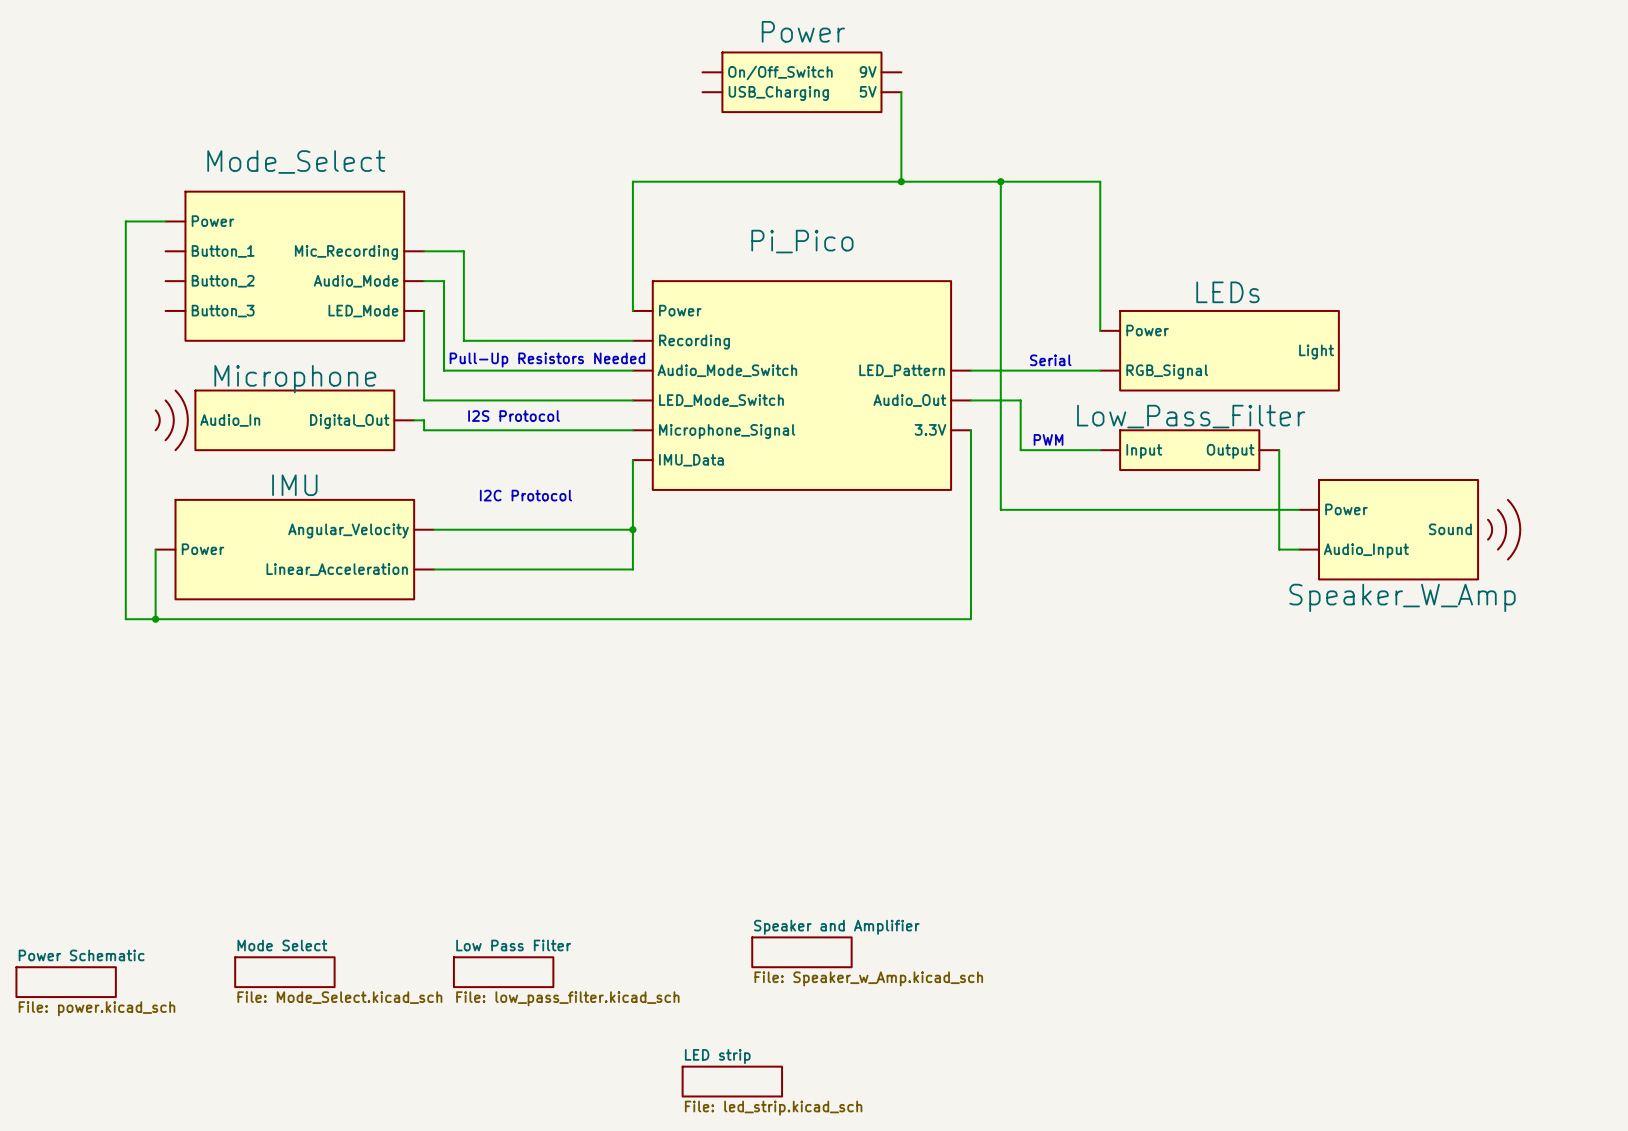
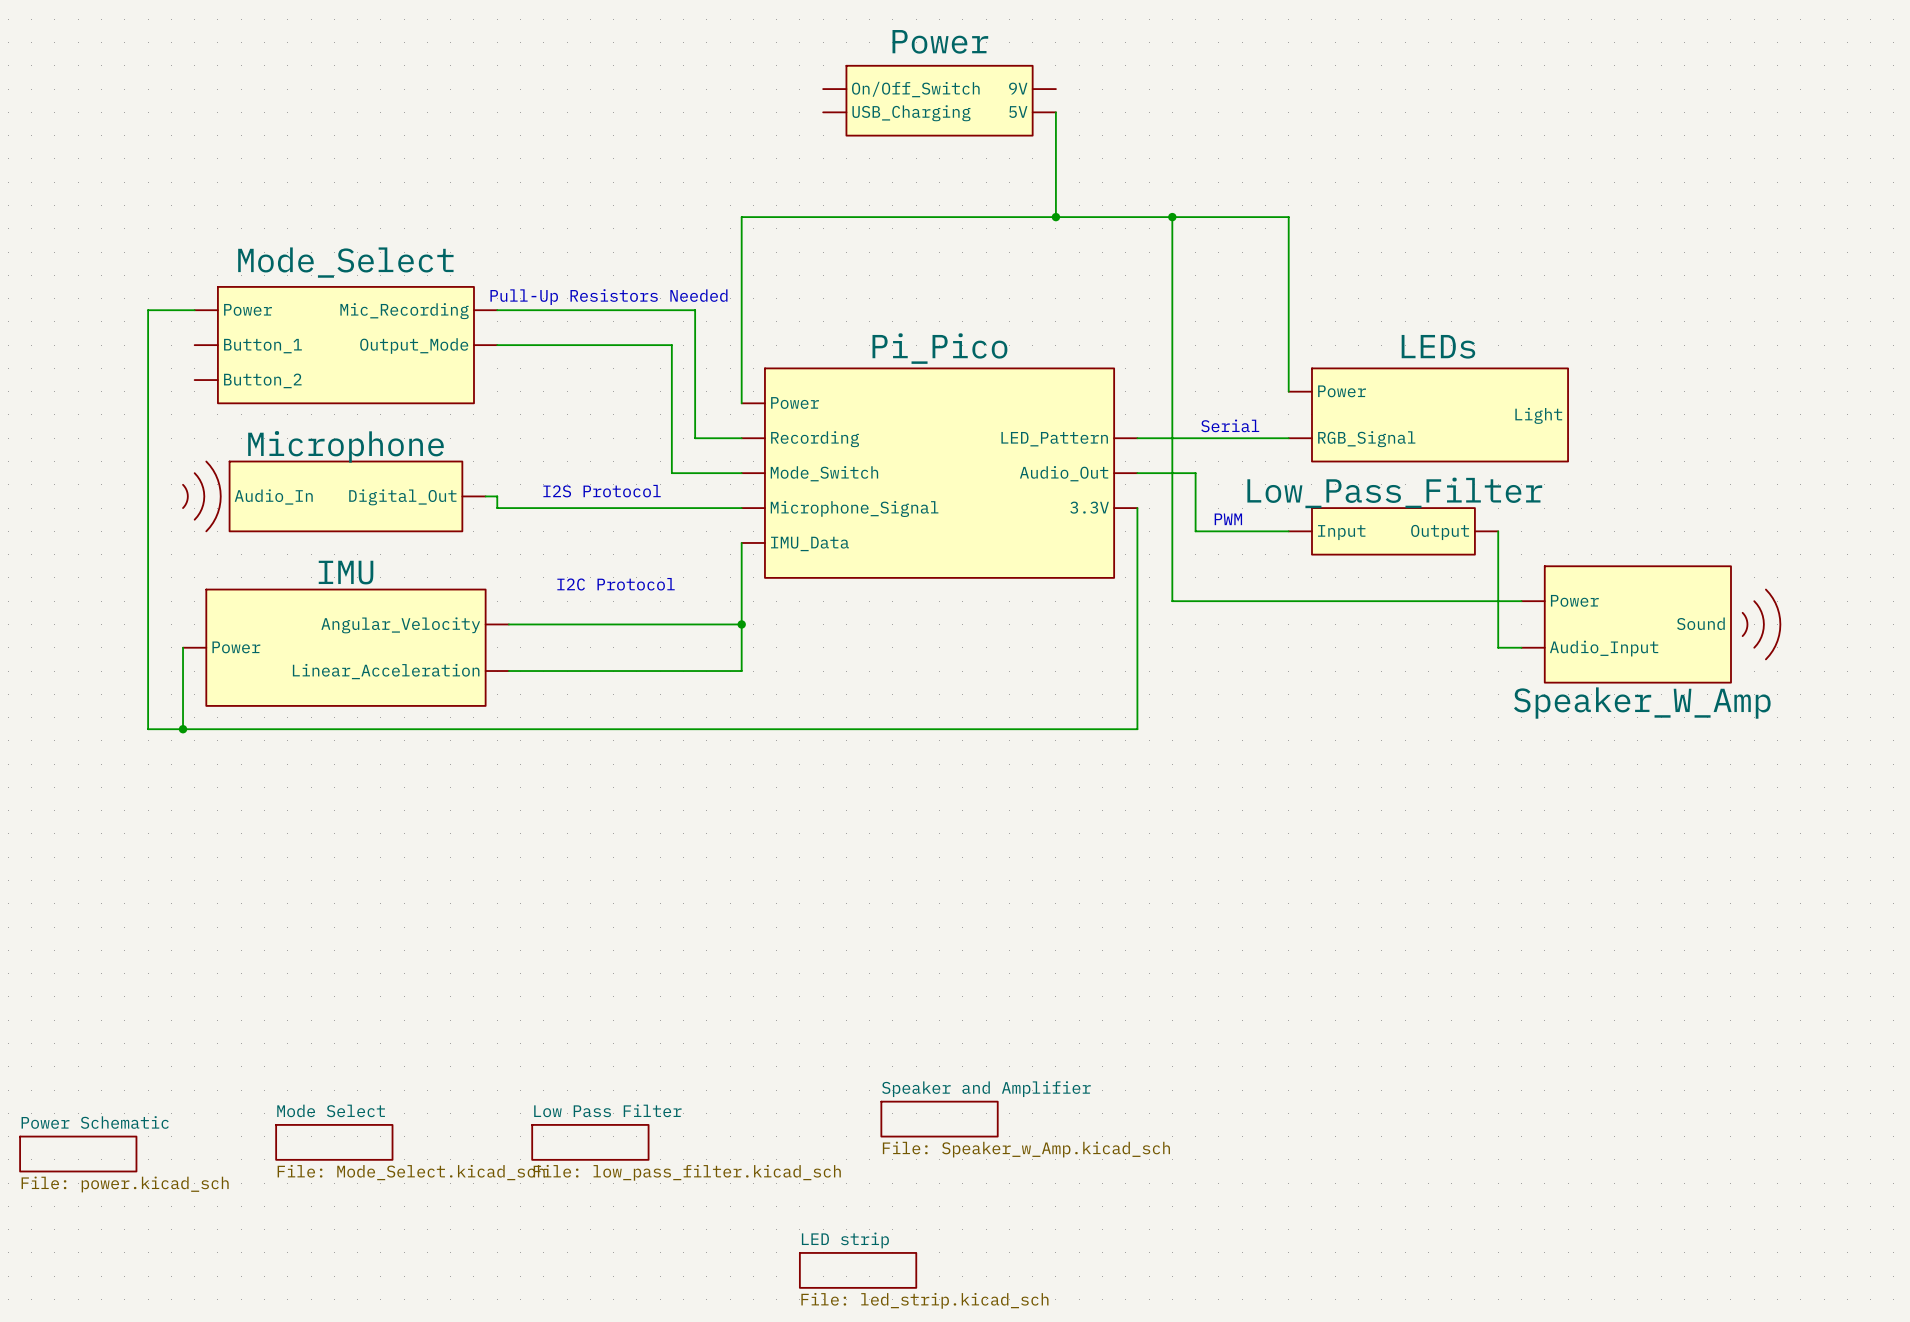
wire: (165, 221) (125, 221) (125, 261) -> (194, 310) (148, 310)
wire: (424, 251) (463, 251) (463, 340) (632, 340) -> (741, 368) (741, 403)
Mode_Select: (294, 266) -> none
wire: (424, 281) (443, 281) (443, 370) (593, 370) -> (497, 310) (695, 310) (695, 438)
Mode_Select: none -> (345, 345)
wire: (424, 310) (424, 400) (573, 400) -> (497, 345) (671, 345) (671, 473)
text position: Pull-Up Resistors Needed (547, 360) -> Pull-Up Resistors Needed (608, 297)
Pi_Pico: (801, 385) -> none
Pi_Pico: none -> (939, 473)

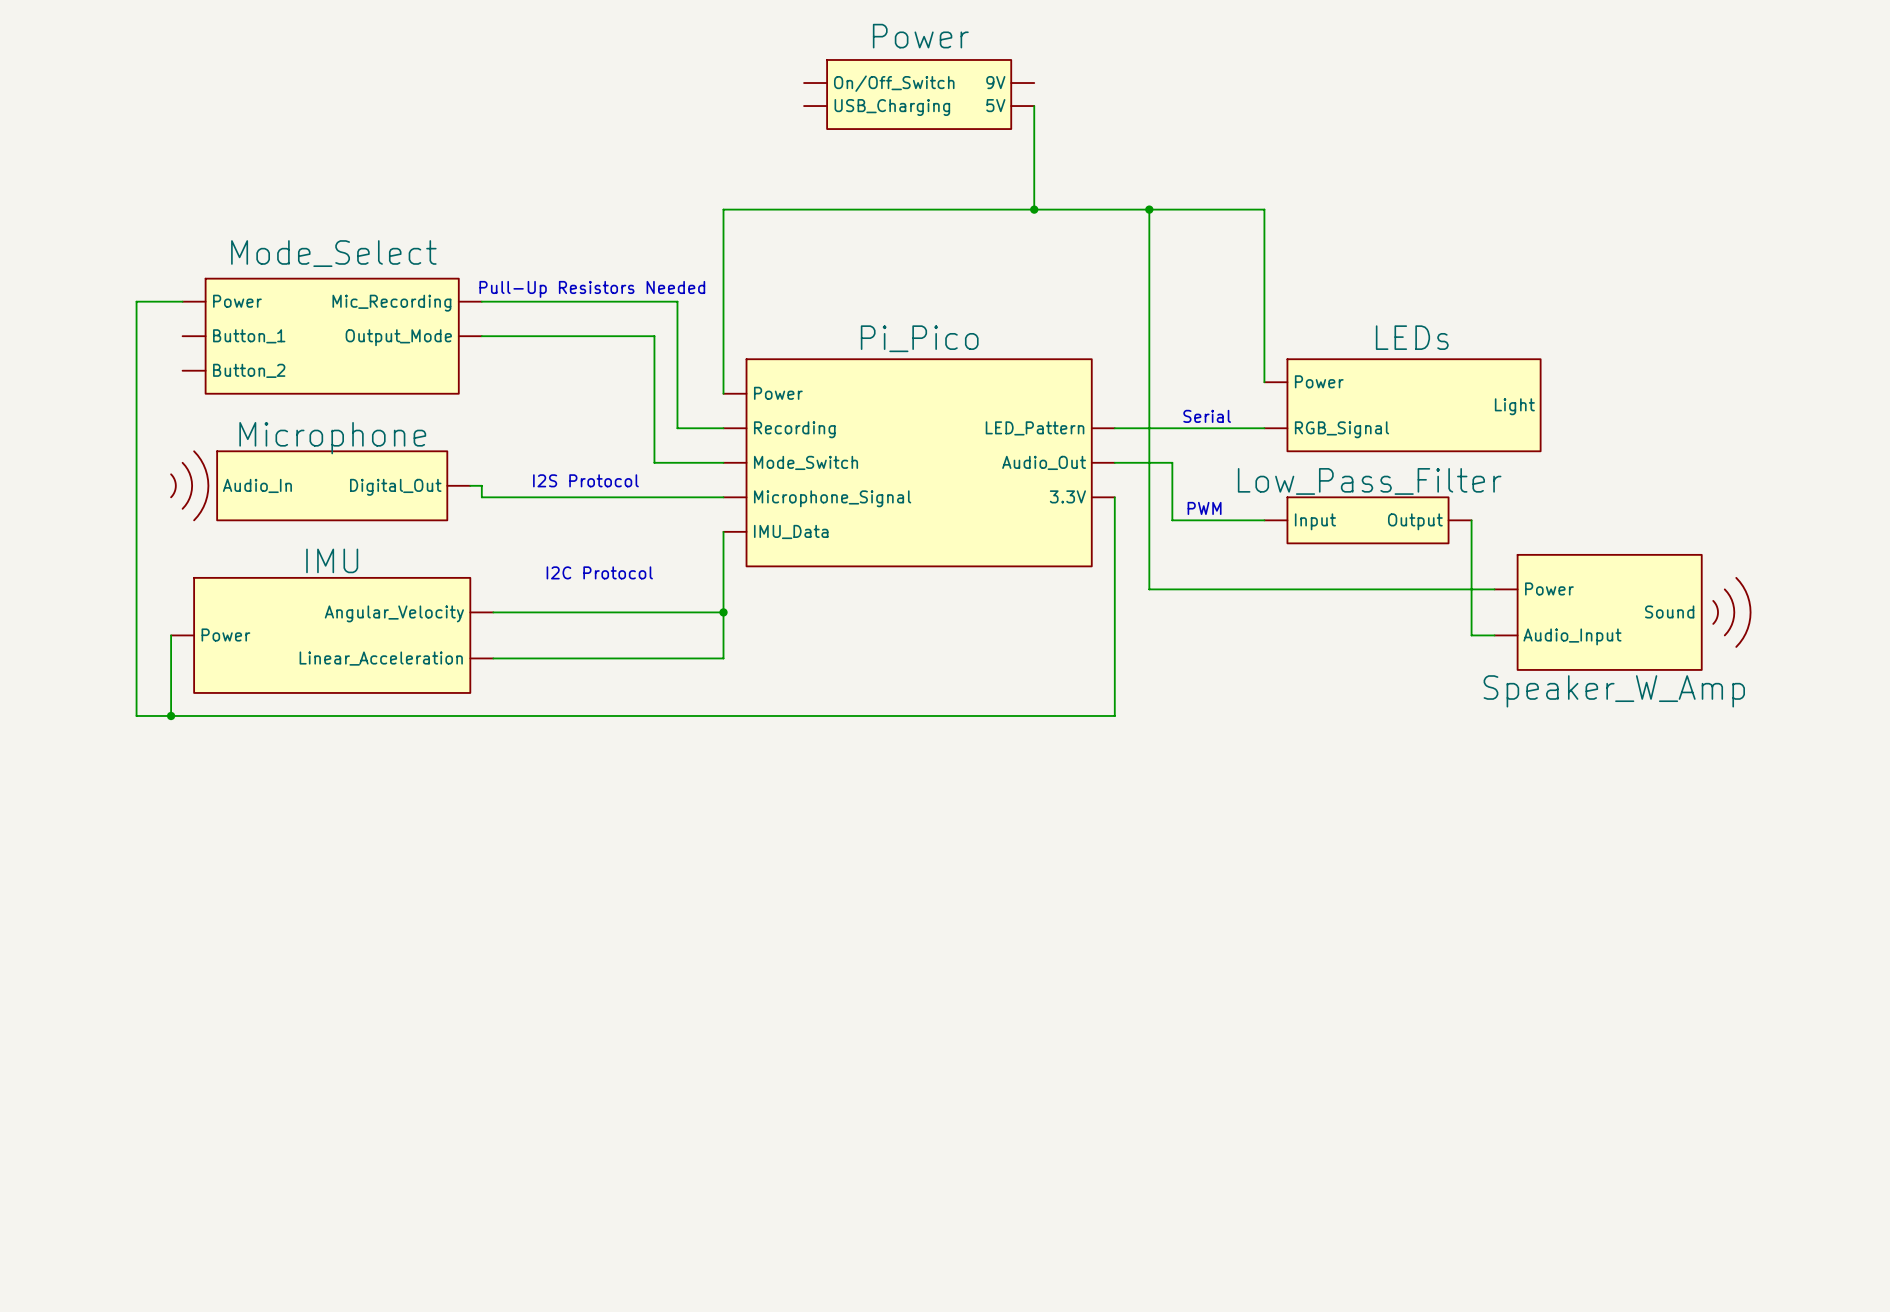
sheet Speaker and Amplifier: File: Speaker_w_Amp.kicad_sch (939, 1119) -> none
sheet Mode Select: File: Mode_Select.kicad_sch (334, 1142) -> none
sheet Low Pass Filter: File: low_pass_filter.kicad_sch (590, 1142) -> none
sheet Power Schematic: File: power.kicad_sch (78, 1154) -> none
sheet LED strip: File: led_strip.kicad_sch (858, 1270) -> none

